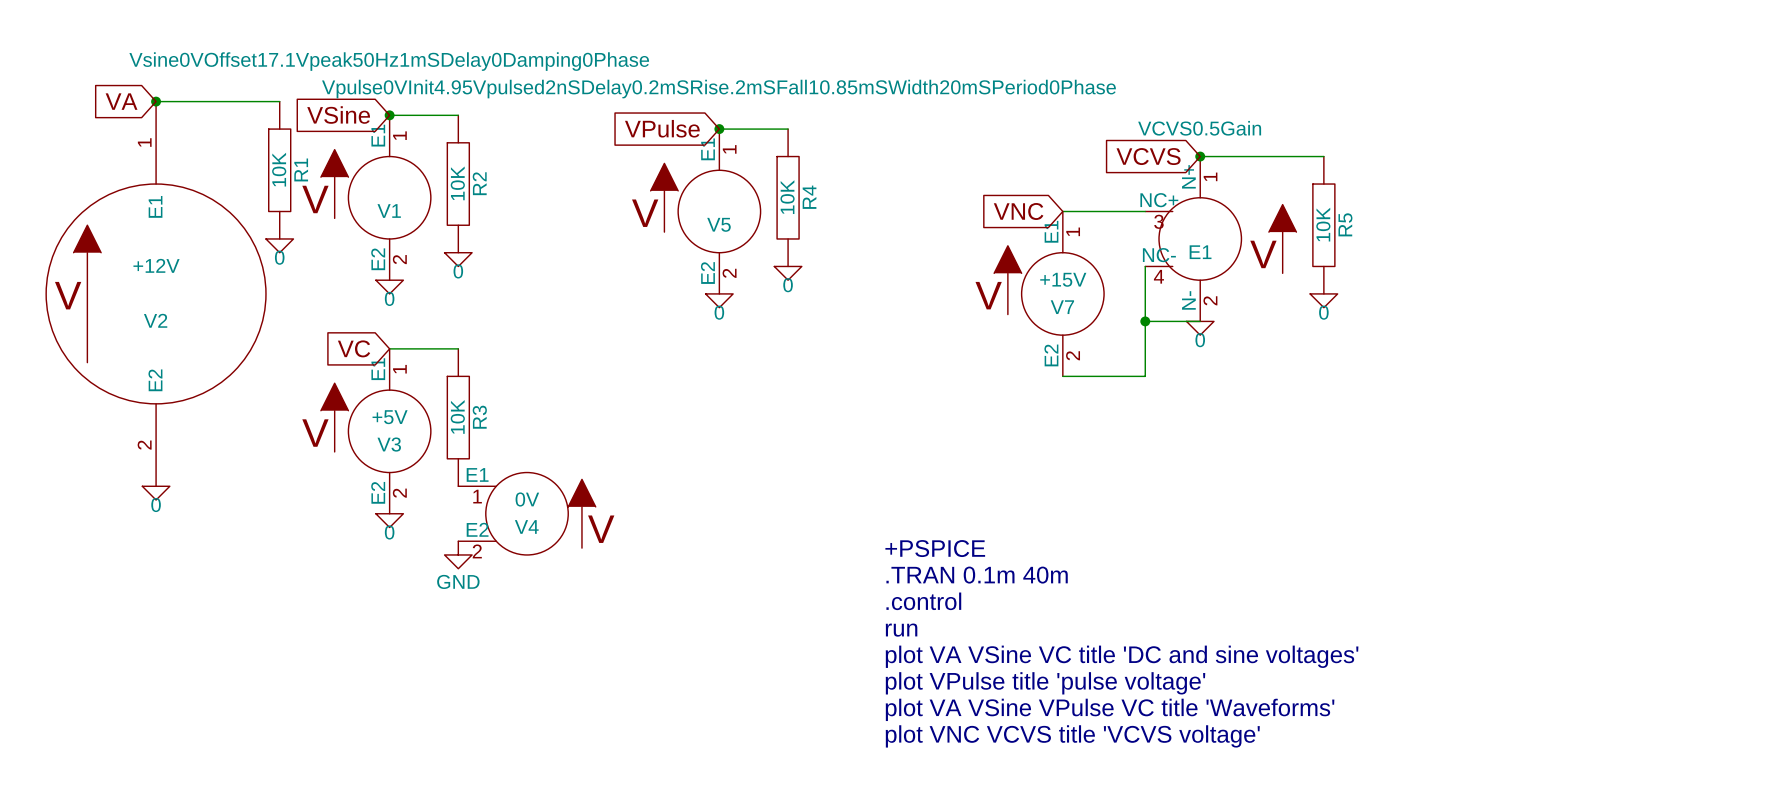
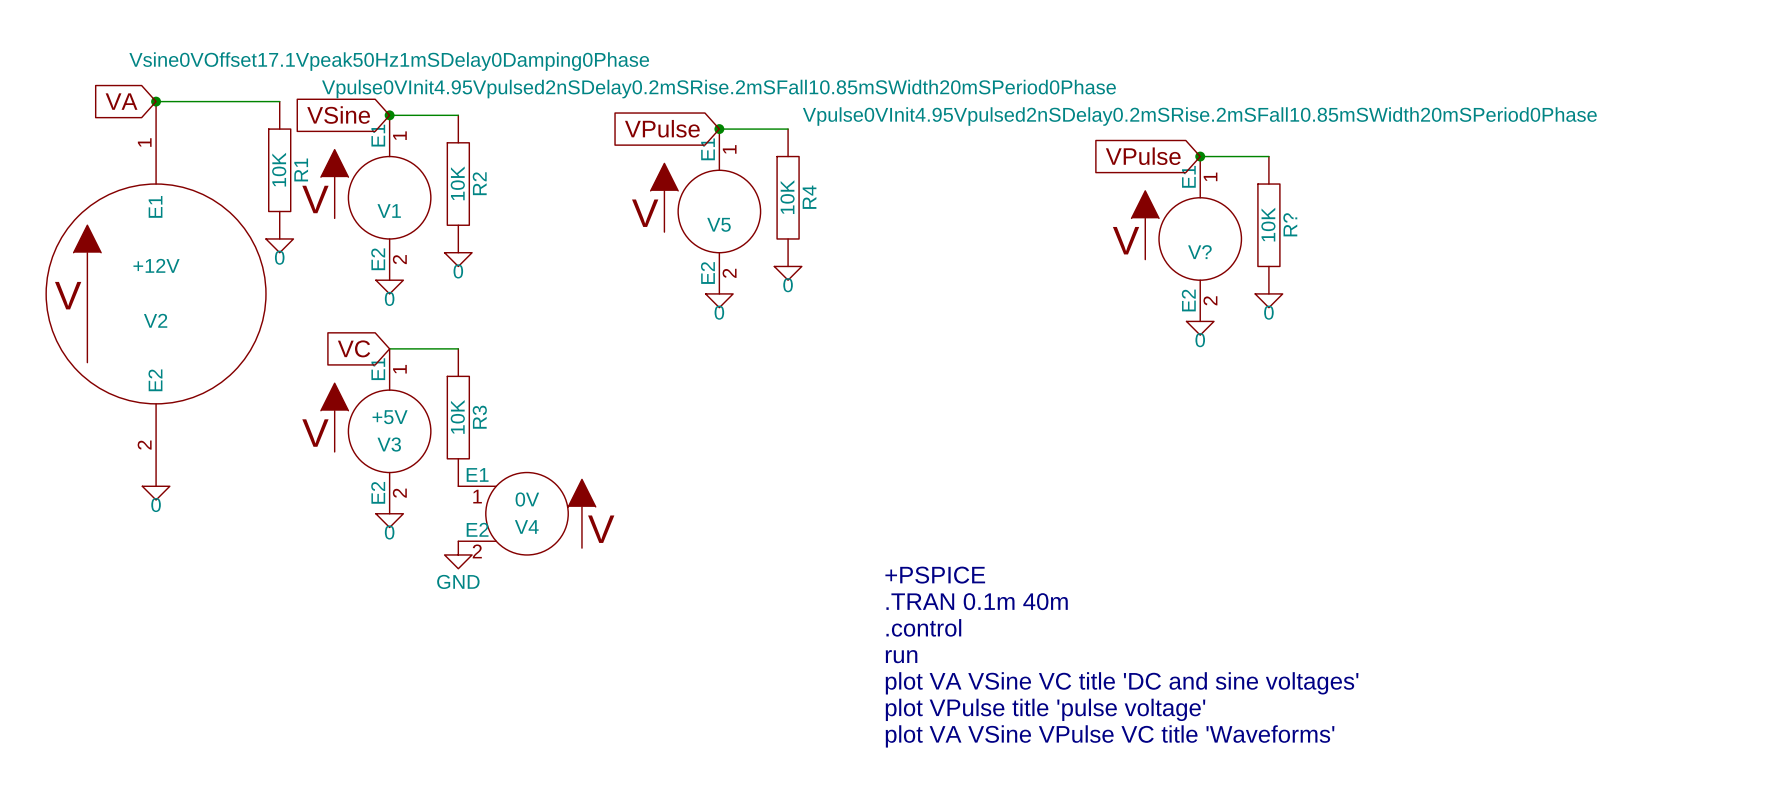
global label: VCVS (1148, 156) -> VPulse (1143, 156)
wire: (1268, 156) (1323, 156) -> none
global label: VNC (1018, 211) -> none
wire: (1062, 211) (1145, 211) -> none
R?: none -> 10K (1268, 225)
R5: 10K (1323, 225) -> none
V?: none -> Vpulse0VInit4.95Vpulsed2nSDelay0.2mSRise.2mSFall10.85mSWidth20mSPeriod0Phase (1186, 238)
E1: VCVS0.5Gain (1220, 238) -> none
wire: (1145, 266) (1145, 376) (1062, 376) -> none
V7: +15V (1049, 293) -> none
power symbol position: 0 (1323, 300) -> 0 (1268, 300)
wire: (1145, 321) (1200, 321) -> none
junction: (1145, 321) -> none
text: +PSPICE (935, 548) -> none
text: .TRAN 0.1m 40m (977, 575) -> +PSPICE (935, 575)
text: .control (923, 601) -> .TRAN 0.1m 40m (977, 601)
text: run (901, 630) -> .control (923, 627)
text: plot VA VSine VC title 'DC and sine voltages' (1122, 656) -> run (901, 656)
text: plot VPulse title 'pulse voltage' (1045, 683) -> plot VA VSine VC title 'DC and sine voltages' (1122, 683)
text: plot VA VSine VPulse VC title 'Waveforms' (1110, 709) -> plot VPulse title 'pulse voltage' (1045, 709)
text: plot VNC VCVS title 'VCVS voltage' (1072, 736) -> plot VA VSine VPulse VC title 'Waveforms' (1110, 736)

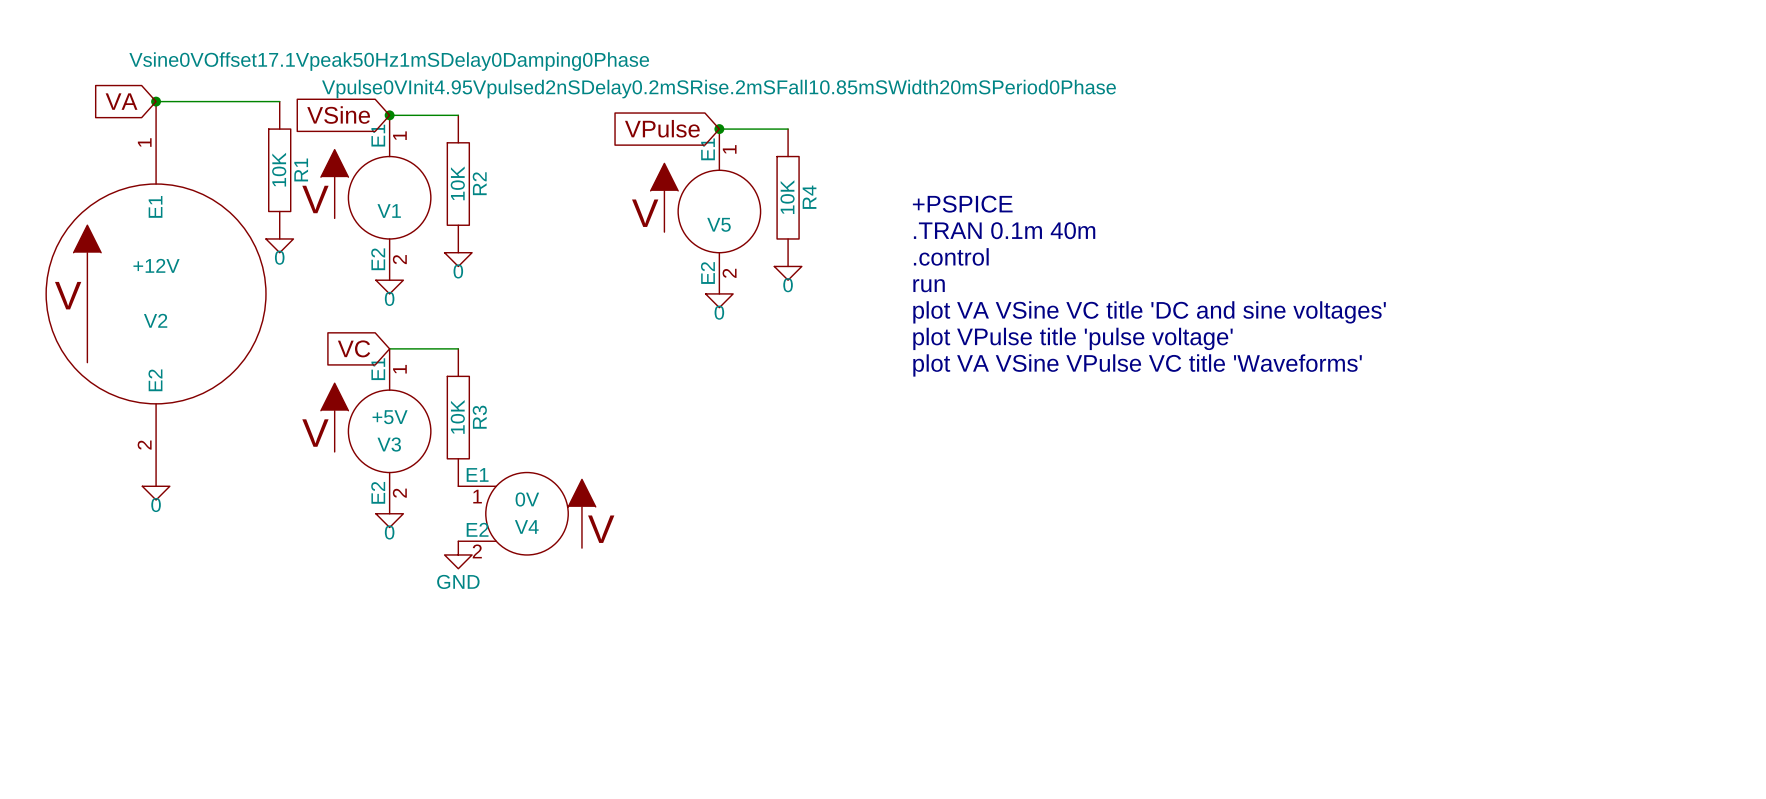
global label: VPulse (1143, 156) -> none
wire: (1200, 156) (1268, 156) -> none
junction: (1200, 156) -> none
text: none -> +PSPICE (962, 204)
R?: 10K (1268, 225) -> none
text: none -> .TRAN 0.1m 40m (1004, 230)
V?: Vpulse0VInit4.95Vpulsed2nSDelay0.2mSRise.2mSFall10.85mSWidth20mSPeriod0Phase (1186, 238) -> none
text: none -> .control (951, 256)
text: none -> run (929, 285)
power symbol: 0 (1268, 300) -> none
text: none -> plot VA VSine VC title 'DC and sine voltages' (1149, 312)
power symbol: 0 (1200, 328) -> none
text: none -> plot VPulse title 'pulse voltage' (1072, 338)
text: none -> plot VA VSine VPulse VC title 'Waveforms' (1137, 365)
text: +PSPICE (935, 575) -> none
text: .TRAN 0.1m 40m (977, 601) -> none
text: .control (923, 627) -> none
text: run (901, 656) -> none
text: plot VA VSine VC title 'DC and sine voltages' (1122, 683) -> none
text: plot VPulse title 'pulse voltage' (1045, 709) -> none
text: plot VA VSine VPulse VC title 'Waveforms' (1110, 736) -> none

